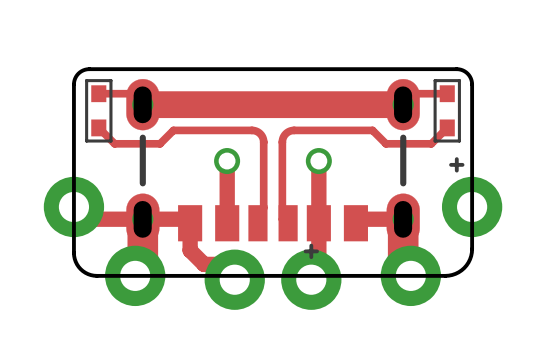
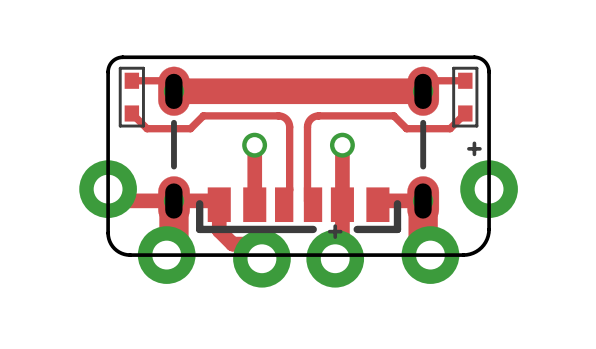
line: none -> (199, 203) (199, 229) (313, 229)
line: none -> (397, 203) (397, 229) (357, 229)

